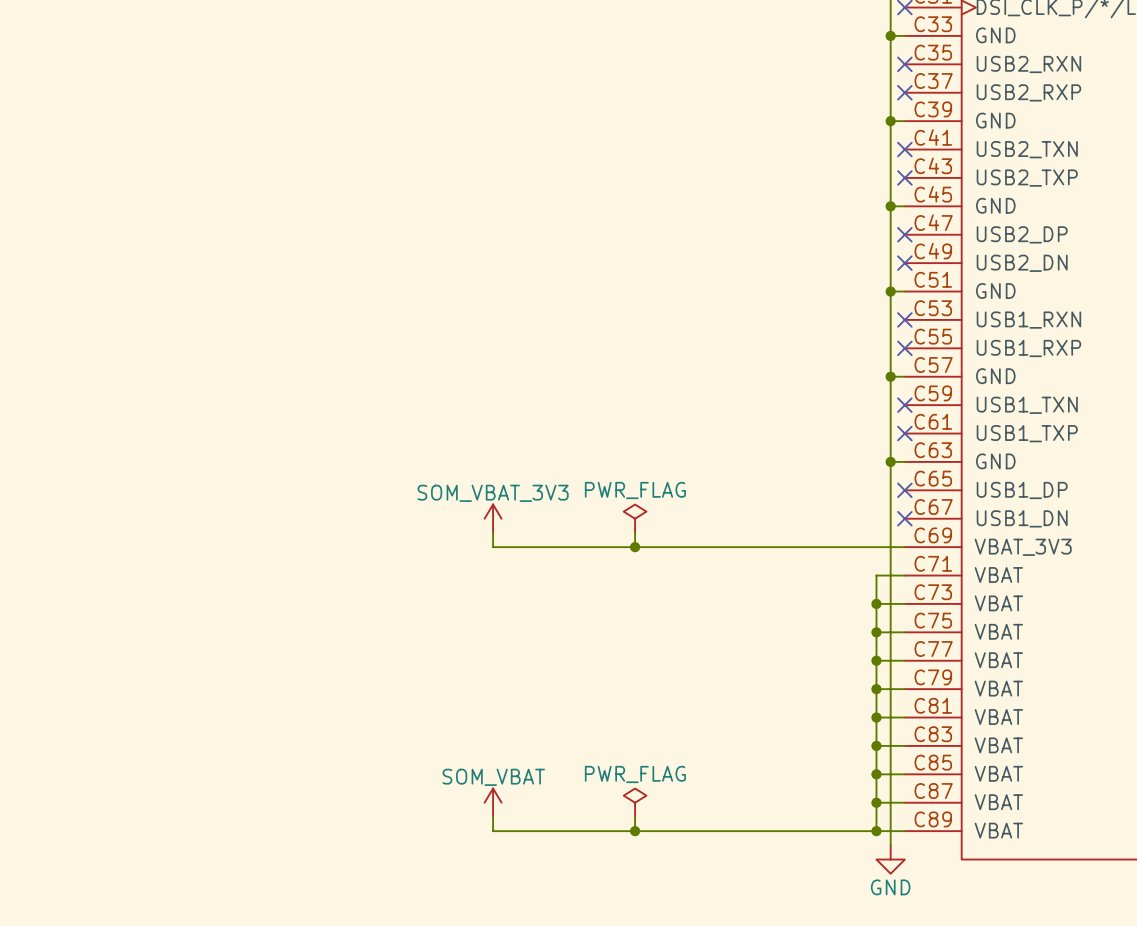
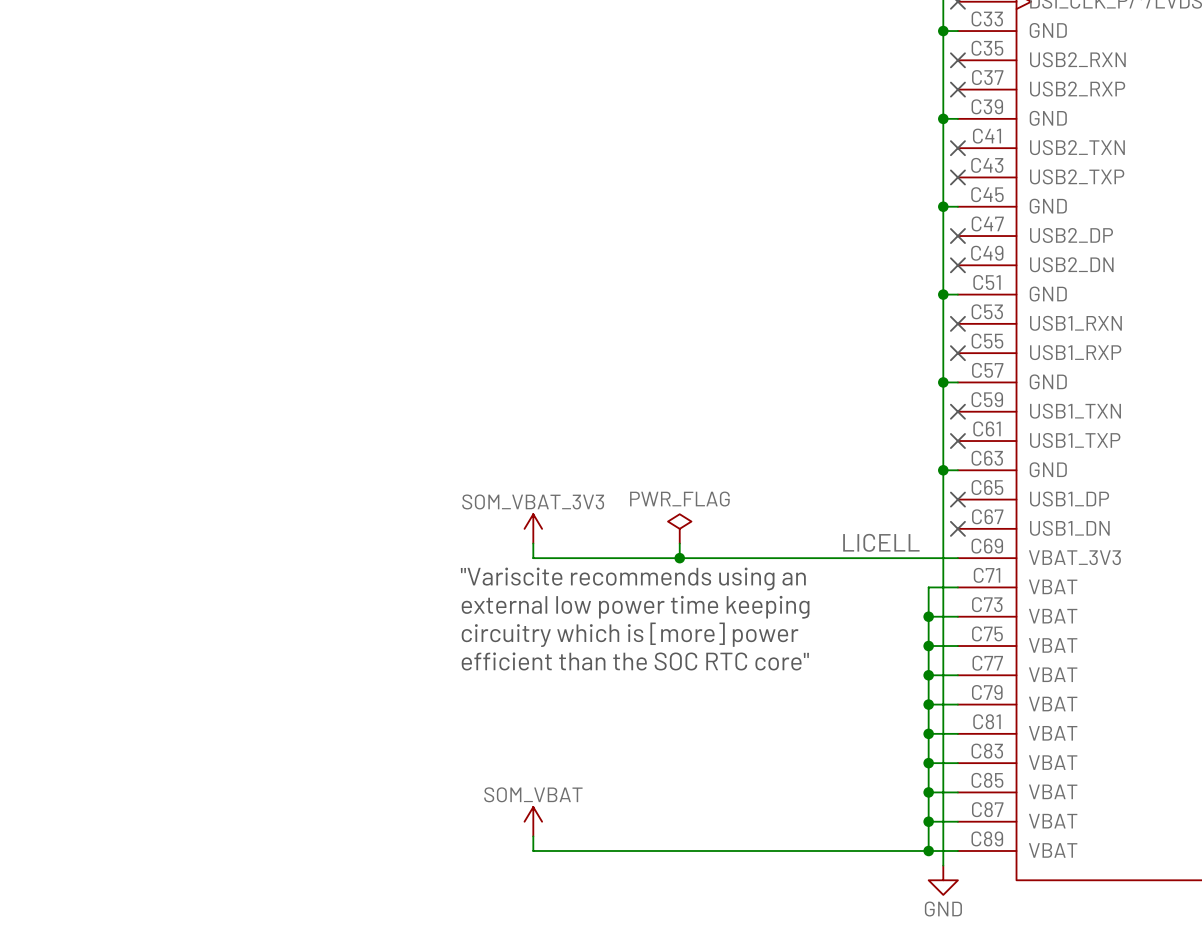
label: none -> LICELL (881, 542)
text: none -> "Variscite recommends using an (633, 578)
text: none -> external low power time keeping (635, 607)
text: none -> circuitry which is [more] power (630, 634)
text: none -> efficient than the SOC RTC core" (635, 661)
power symbol: PWR_FLAG (635, 802) -> none
wire: (635, 816) (635, 831) -> none
junction: (635, 831) -> none

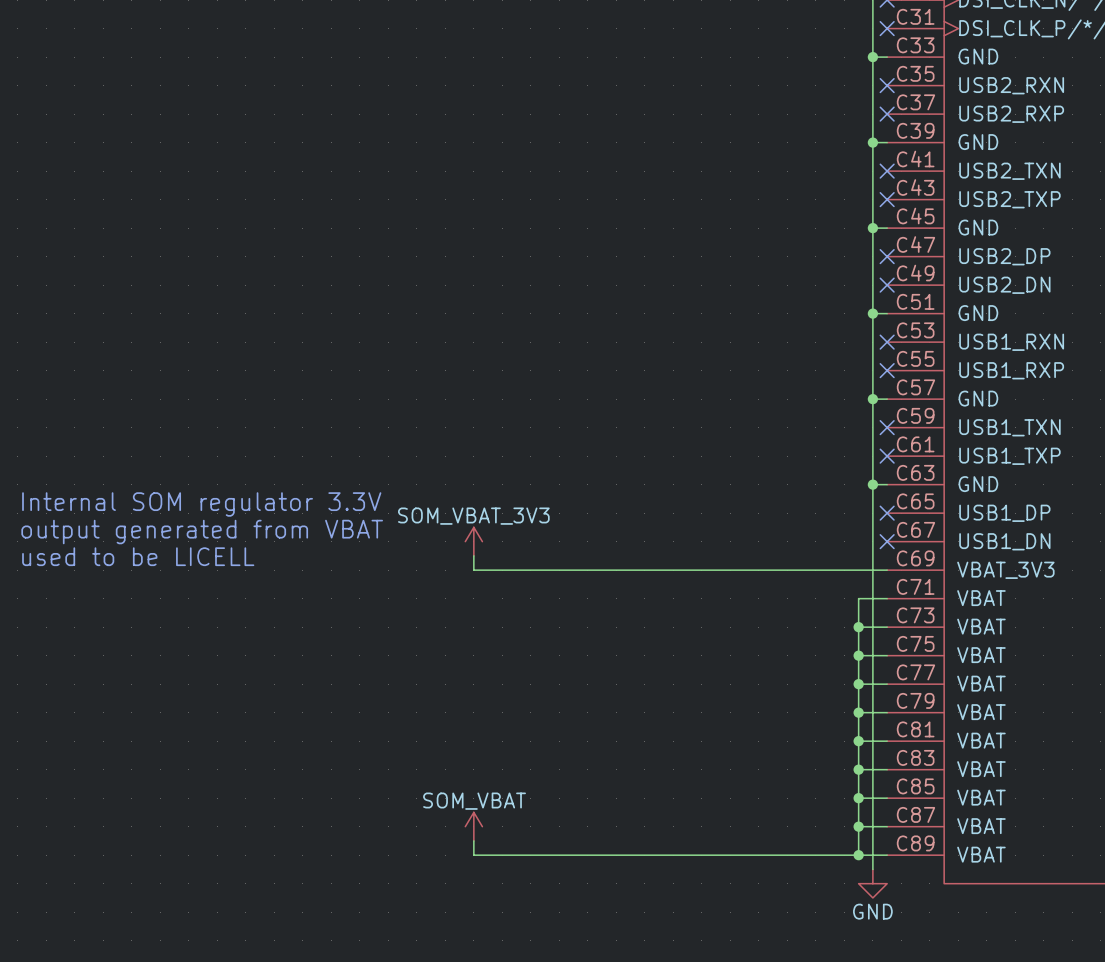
text: none -> Internal SOM regulator 3.3V (201, 504)
text: none -> output generated from VBAT (202, 532)
power symbol: PWR_FLAG (679, 528) -> none
label: LICELL (881, 542) -> none
wire: (679, 543) (679, 558) -> none
text: none -> used to be LICELL (138, 556)
junction: (679, 558) -> none
text: "Variscite recommends using an (633, 578) -> none
text: external low power time keeping (635, 607) -> none
text: circuitry which is [more] power (630, 634) -> none
text: efficient than the SOC RTC core" (635, 661) -> none

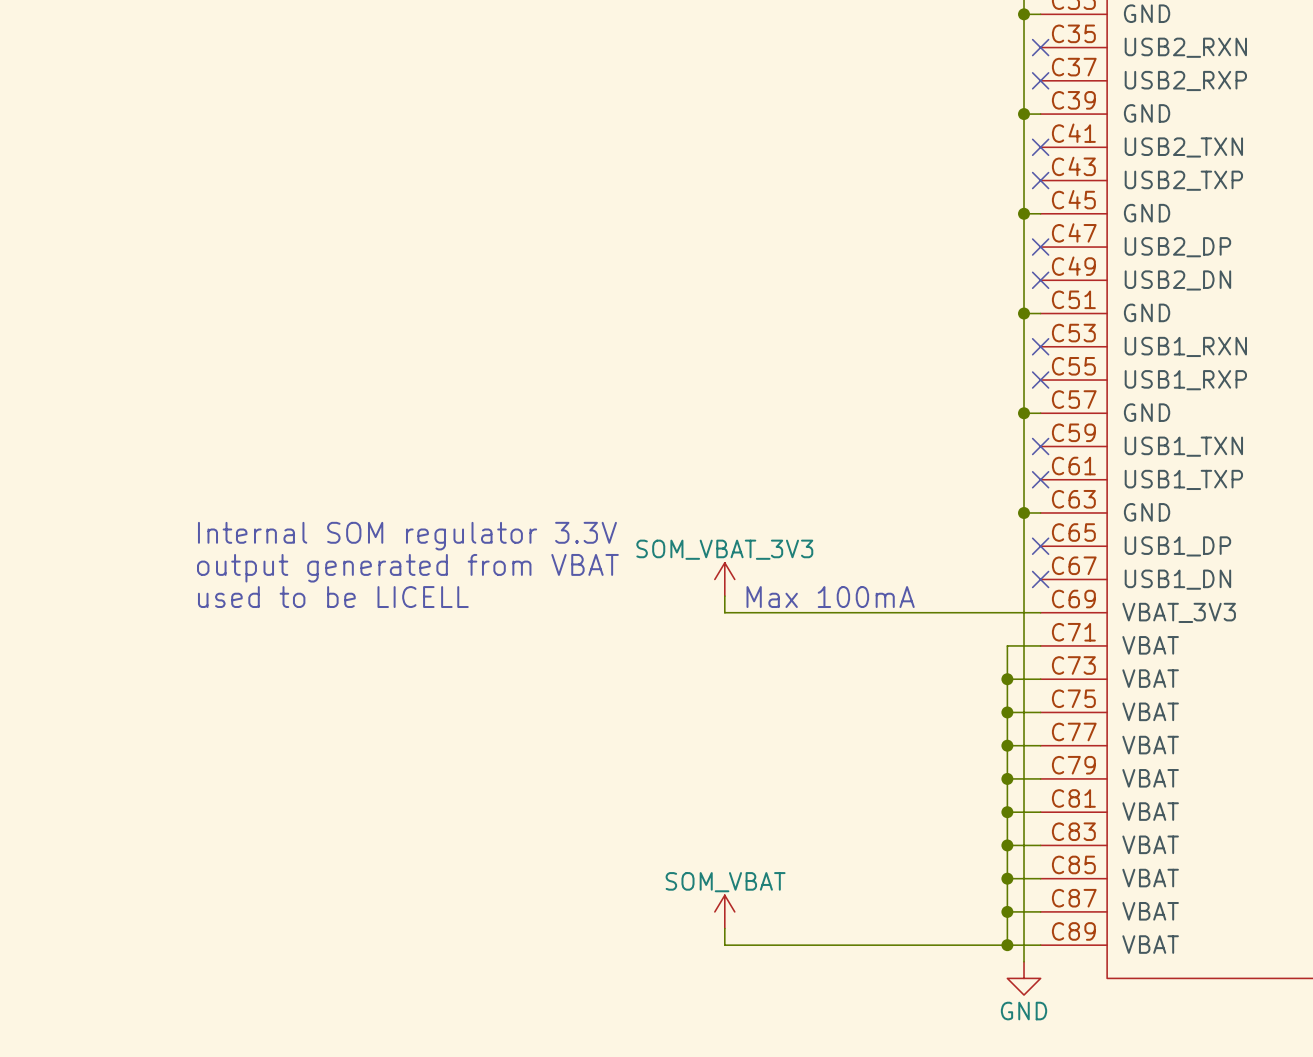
text position: Internal SOM regulator 3.3V (201, 504) -> Internal SOM regulator 3.3V (407, 536)
text position: output generated from VBAT (202, 532) -> output generated from VBAT (407, 568)
power symbol position: SOM_VBAT_3V3 (473, 541) -> SOM_VBAT_3V3 (724, 579)
wire: (473, 555) (473, 570) (616, 570) -> (724, 596) (724, 612)
text position: used to be LICELL (138, 556) -> used to be LICELL (333, 597)
text: none -> Max 100mA (830, 597)
power symbol position: SOM_VBAT (473, 826) -> SOM_VBAT (724, 911)
wire: (473, 840) (473, 855) (616, 855) -> (724, 928) (724, 945)

